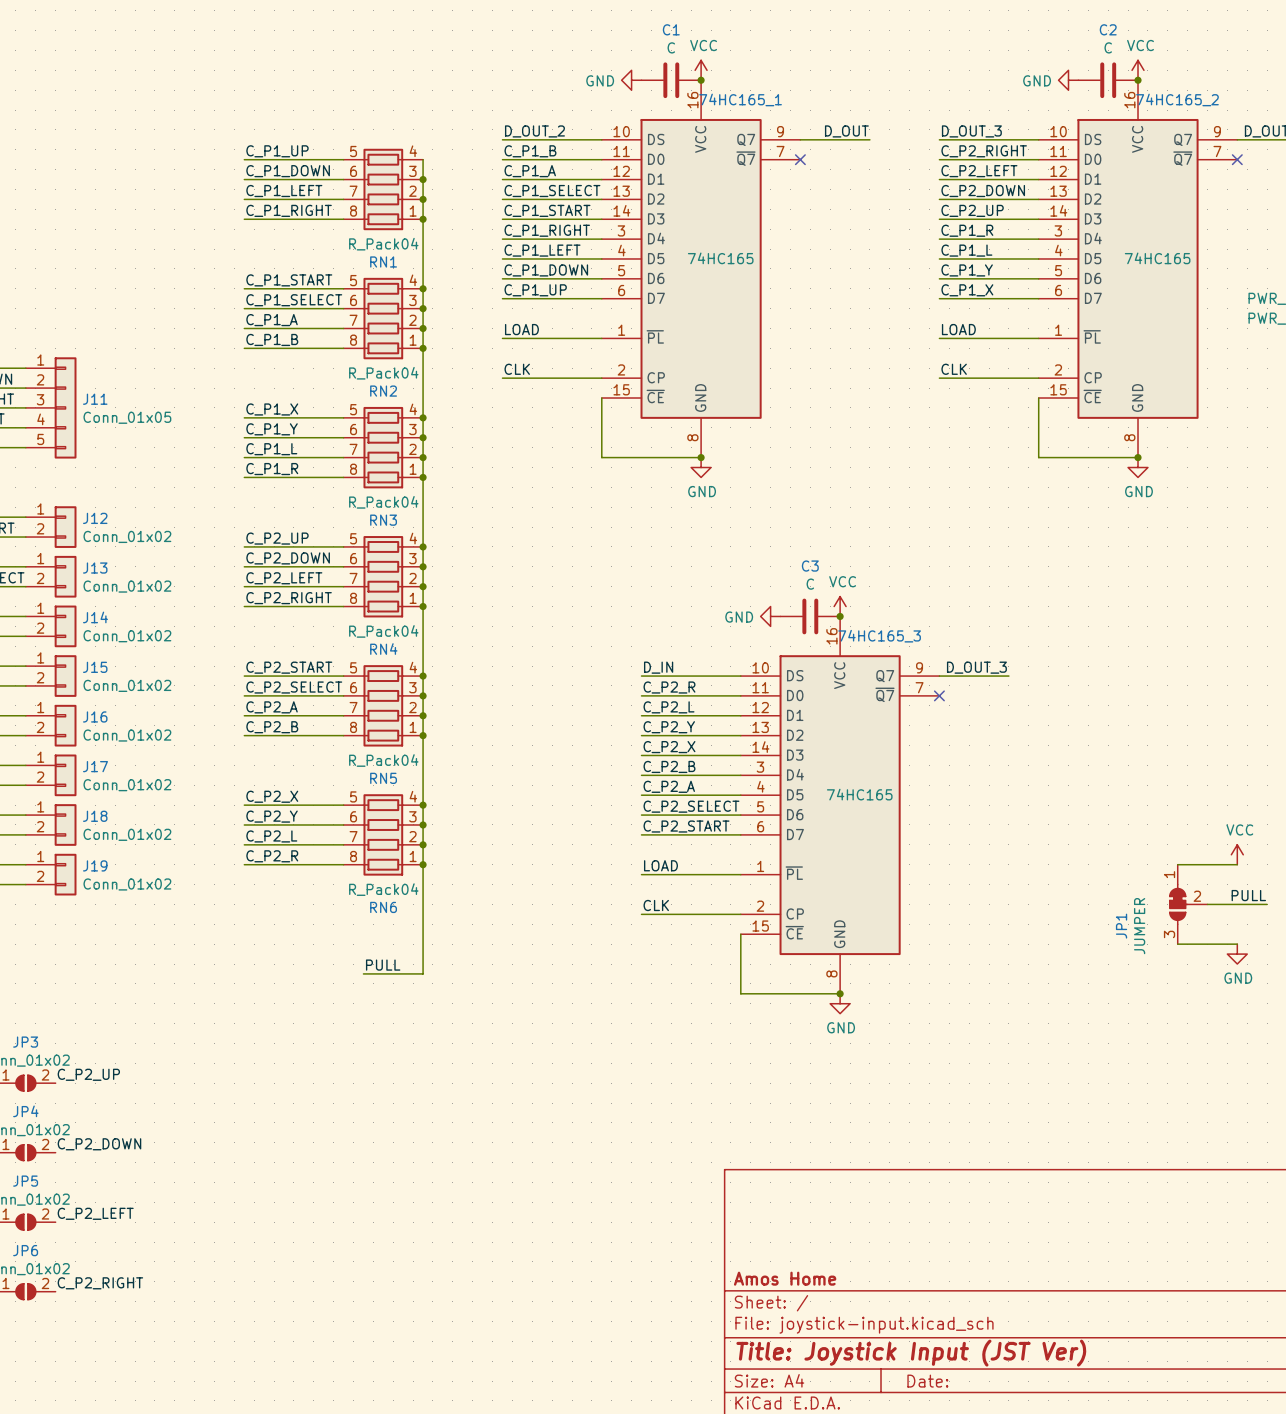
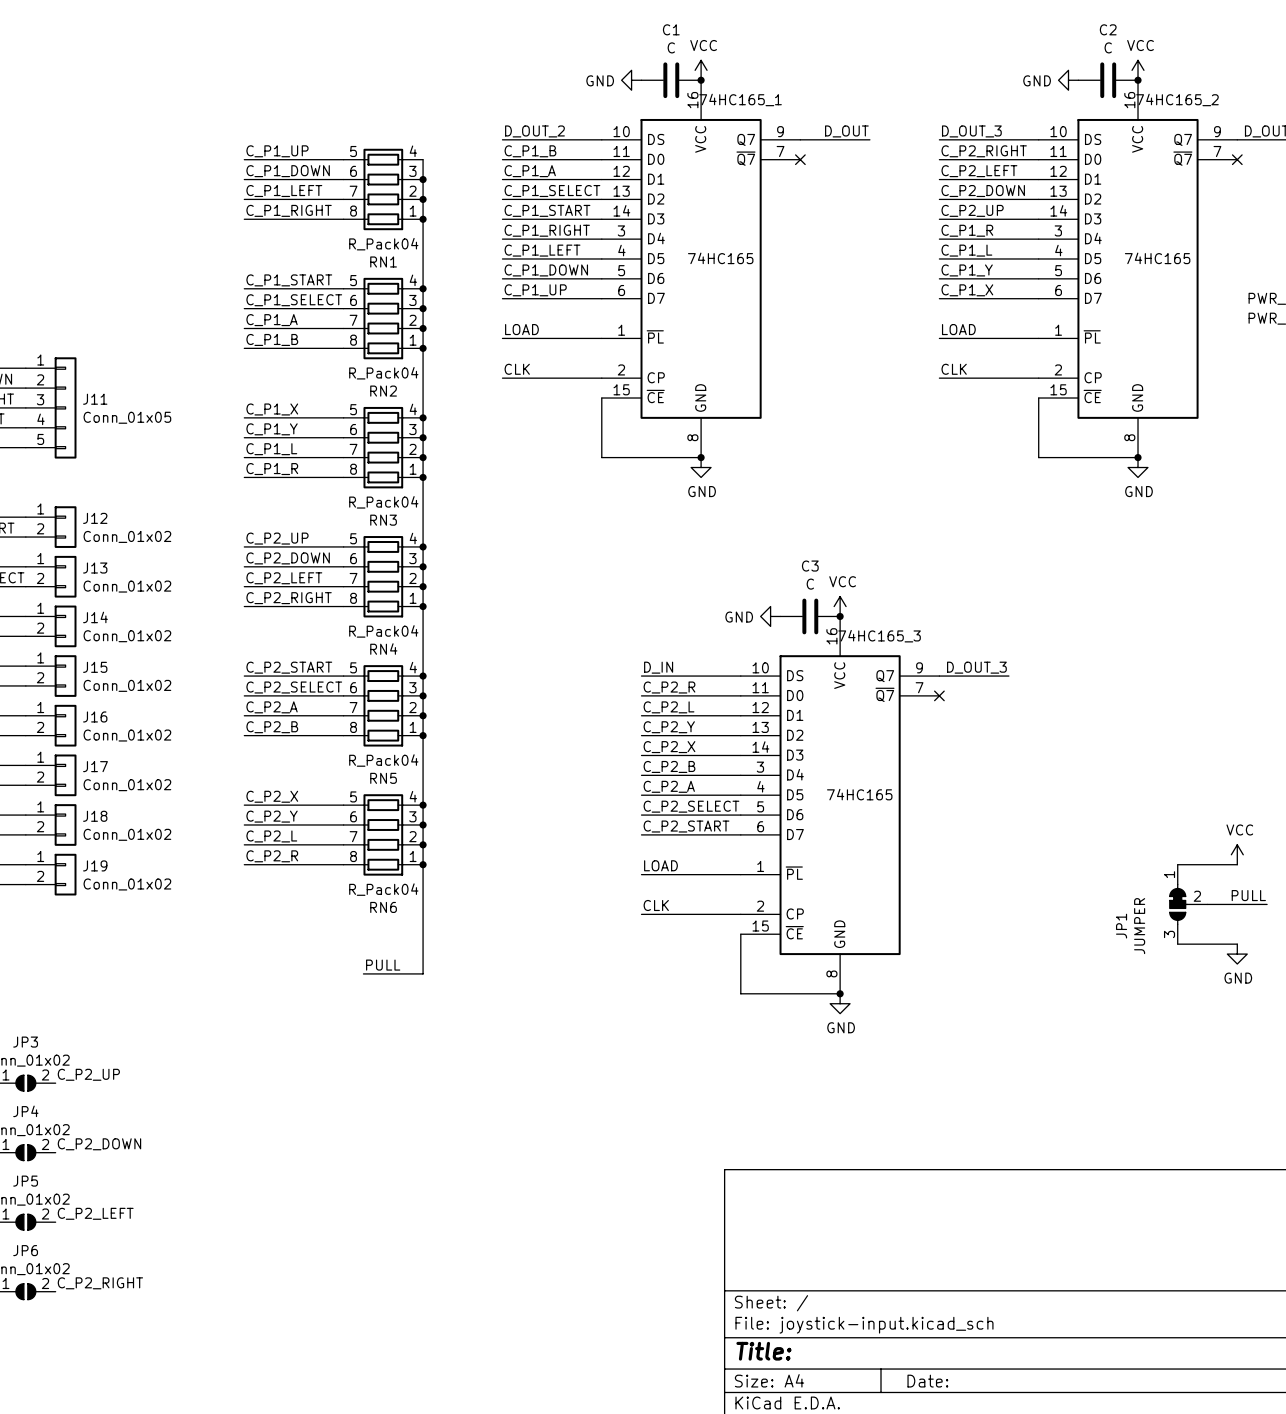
title block: Amos Home (785, 1278) -> none
title block: Title: Joystick Input (JST Ver) (911, 1353) -> Title: (763, 1351)

